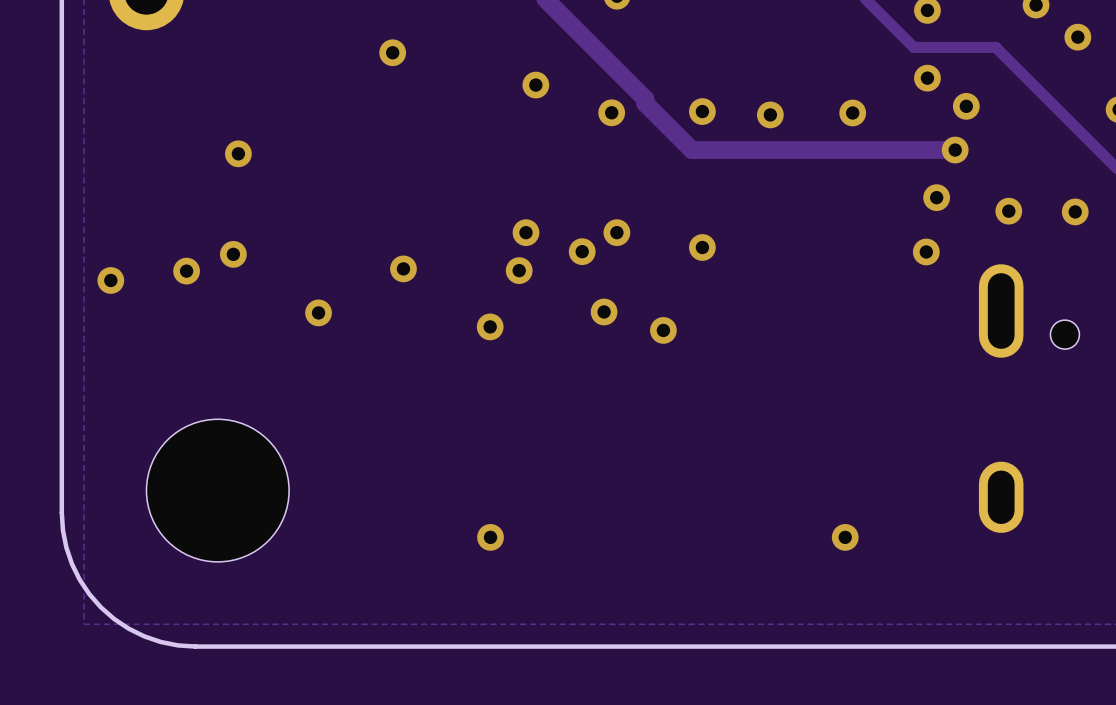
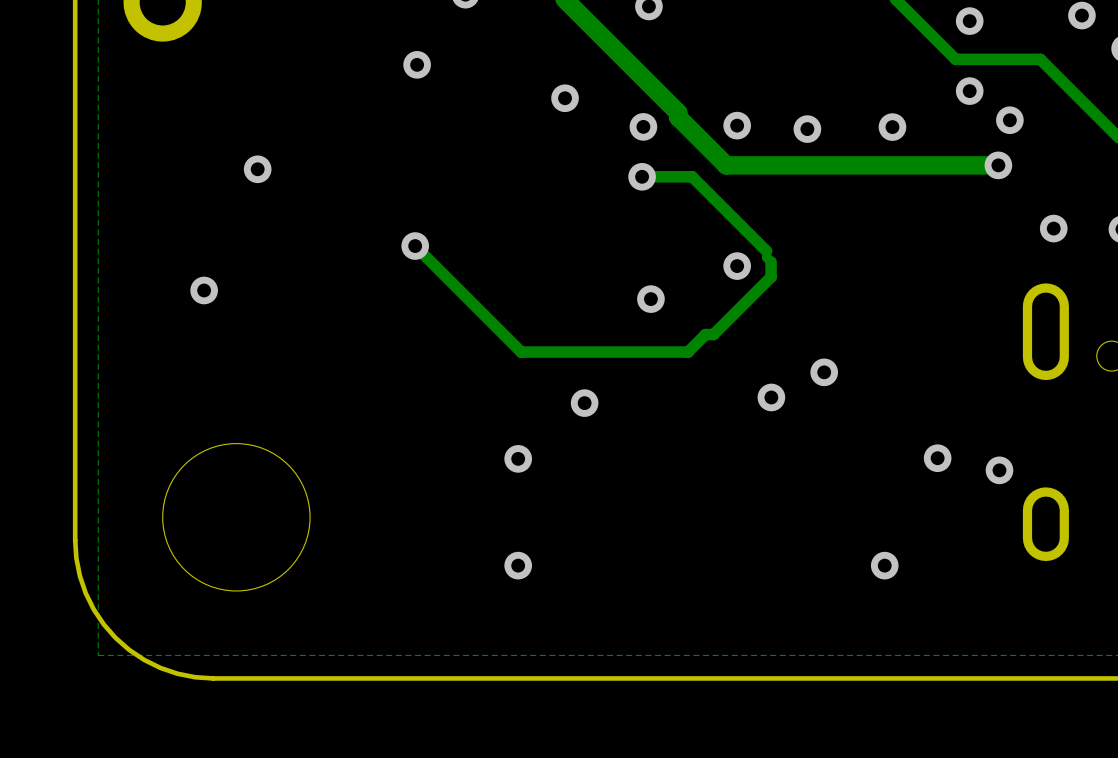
track: none -> (642, 176) (692, 176) (766, 251) (766, 257) (771, 261) (771, 277) (713, 334) (705, 334) (688, 352) (521, 352) (415, 246)
via: none -> (642, 176)
via: (936, 197) -> none
via: (526, 232) -> none
via: (616, 232) -> none
via: (582, 251) -> none
via: (926, 251) -> none
via: (233, 254) -> none
via position: (403, 268) -> (415, 246)
via: (519, 270) -> none
via: none -> (650, 299)
via: (110, 280) -> none
via: (604, 311) -> none
via: (318, 312) -> none
via: (490, 326) -> none
via: (663, 330) -> none
via: none -> (824, 372)
via: none -> (771, 397)
via: none -> (584, 403)
via: none -> (937, 458)
via: none -> (518, 458)
via: none -> (999, 470)

